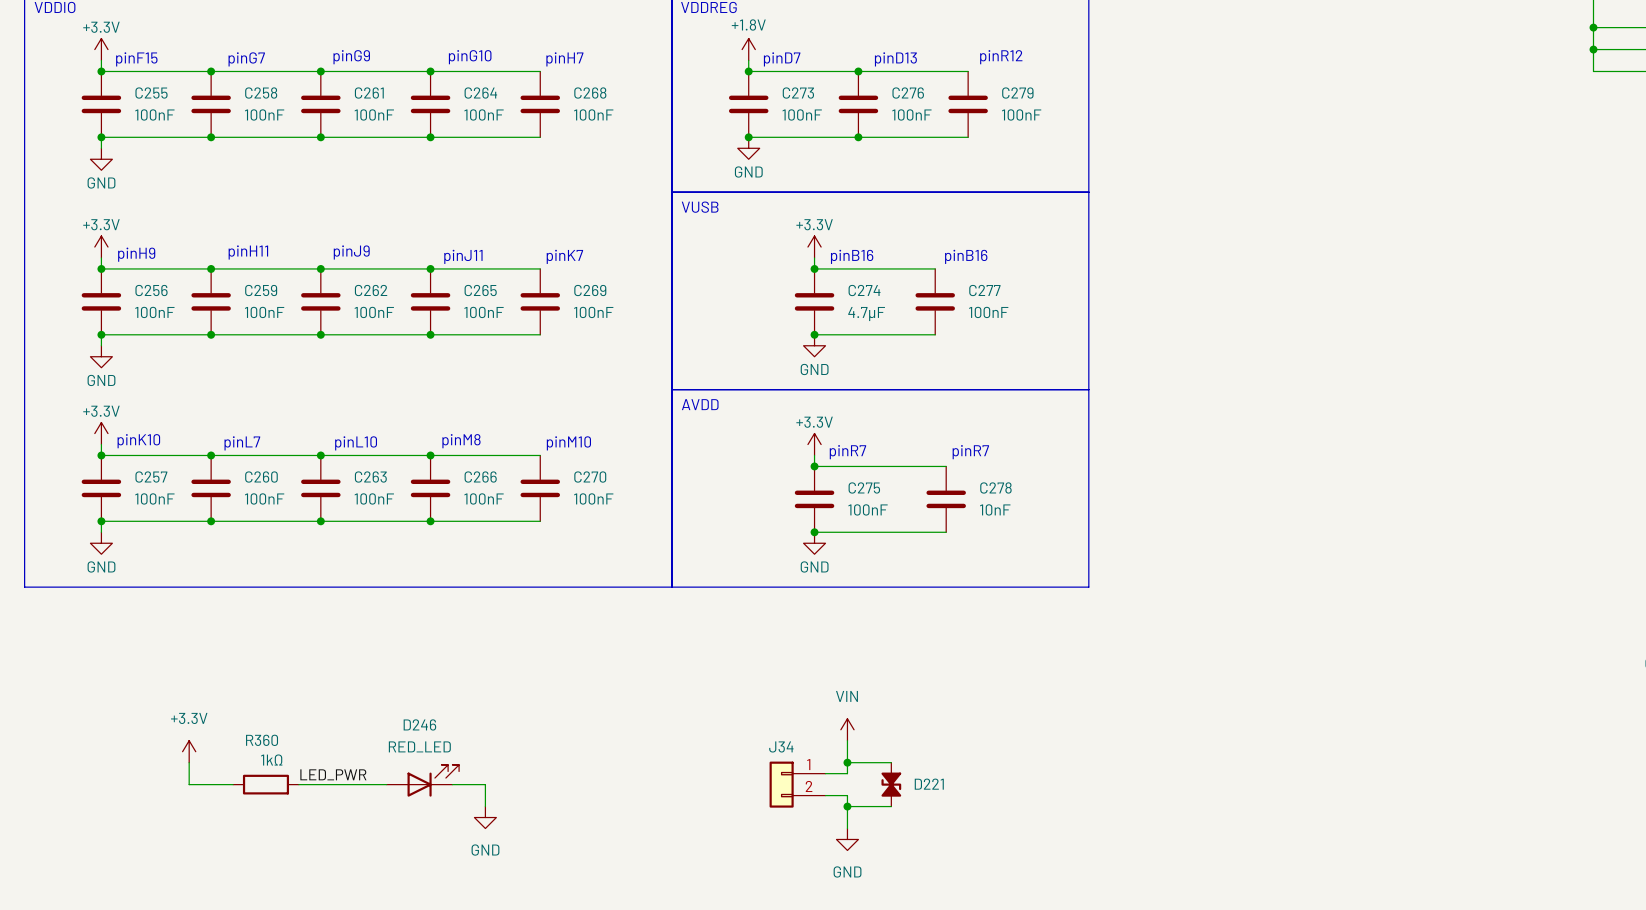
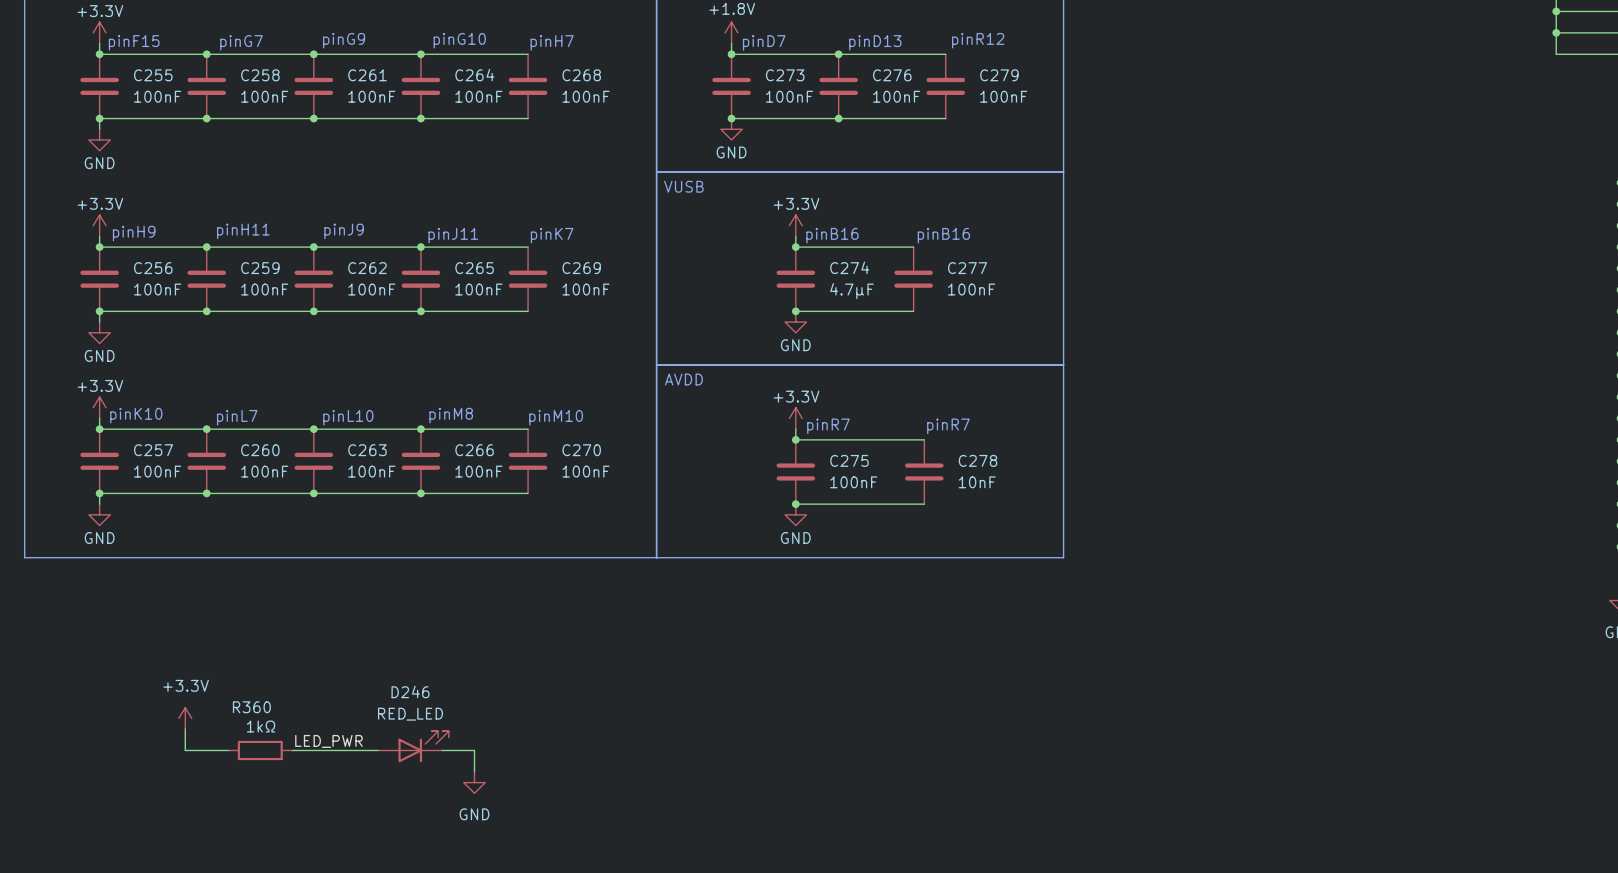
power symbol: VIN (847, 729) -> none
wire: (847, 740) (847, 773) (825, 773) -> none
wire: (847, 762) (891, 762) -> none
junction: (847, 762) -> none
J34: (797, 784) -> none
D221: (891, 784) -> none
wire: (825, 795) (847, 795) (847, 828) -> none
wire: (847, 806) (891, 806) -> none
junction: (847, 806) -> none
power symbol: GND (847, 839) -> none

